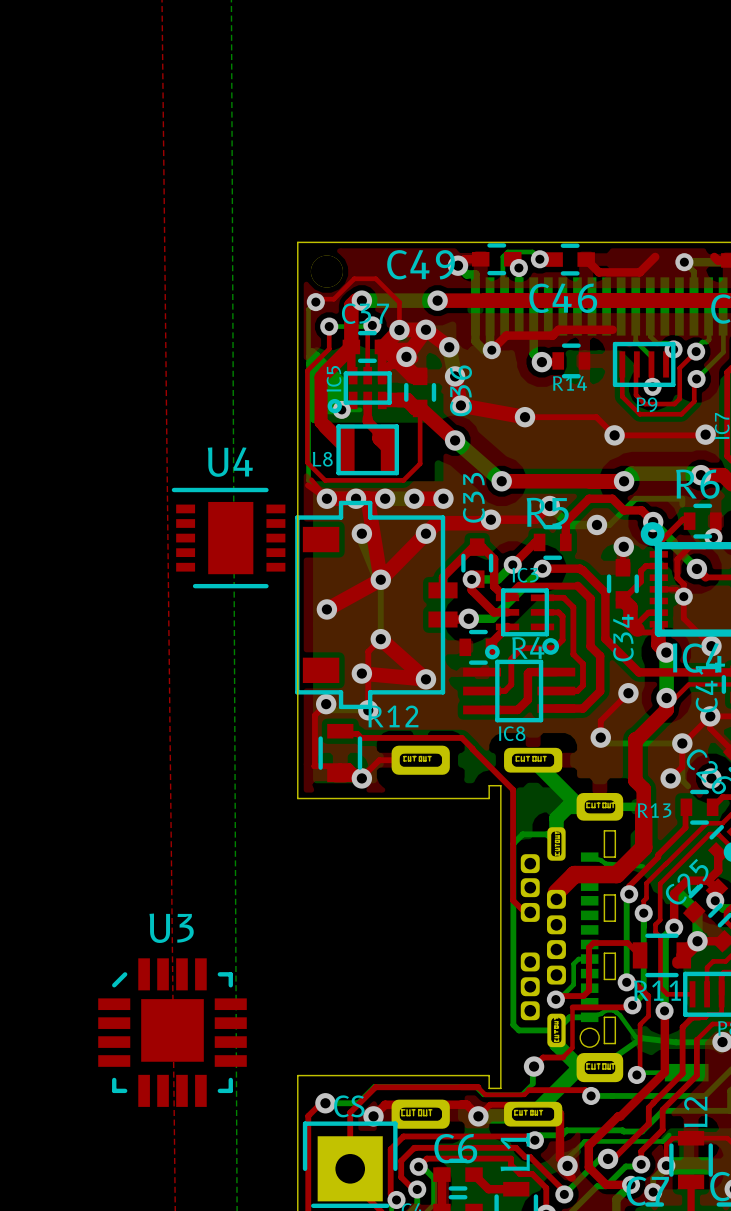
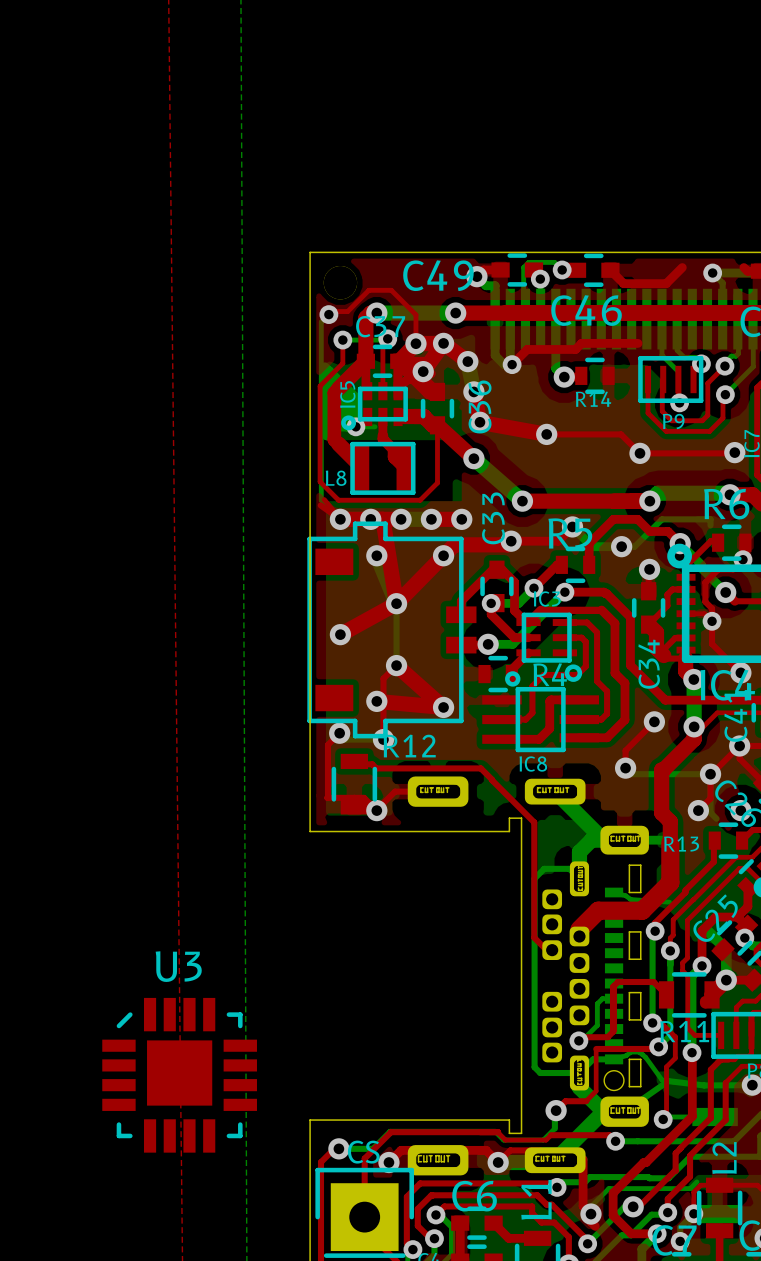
U4: (228, 538) -> none

